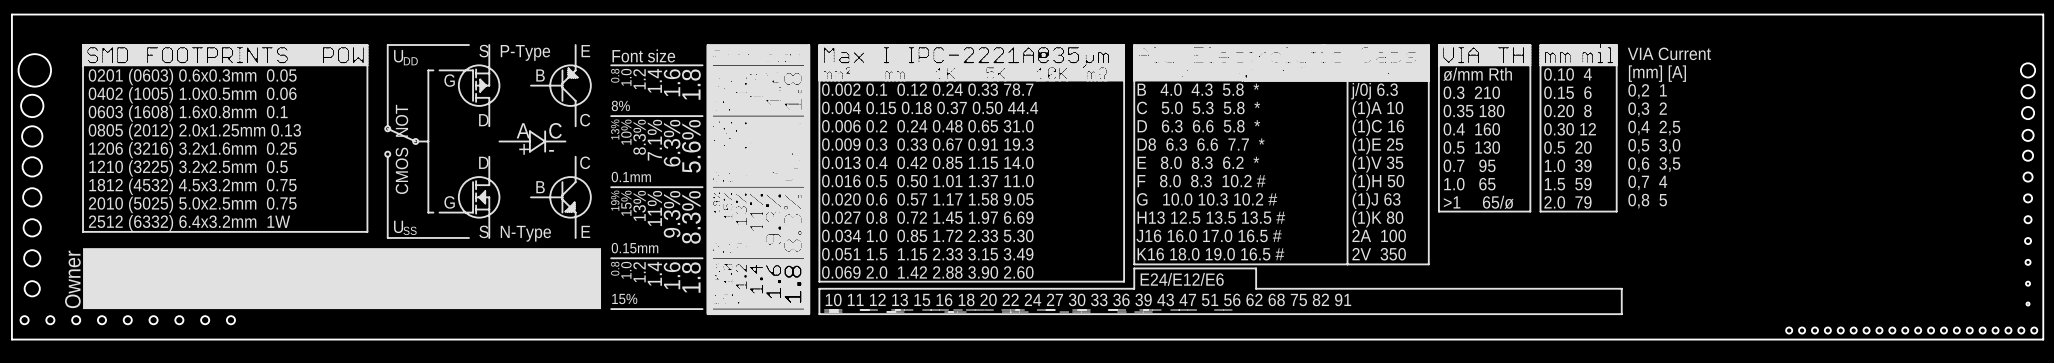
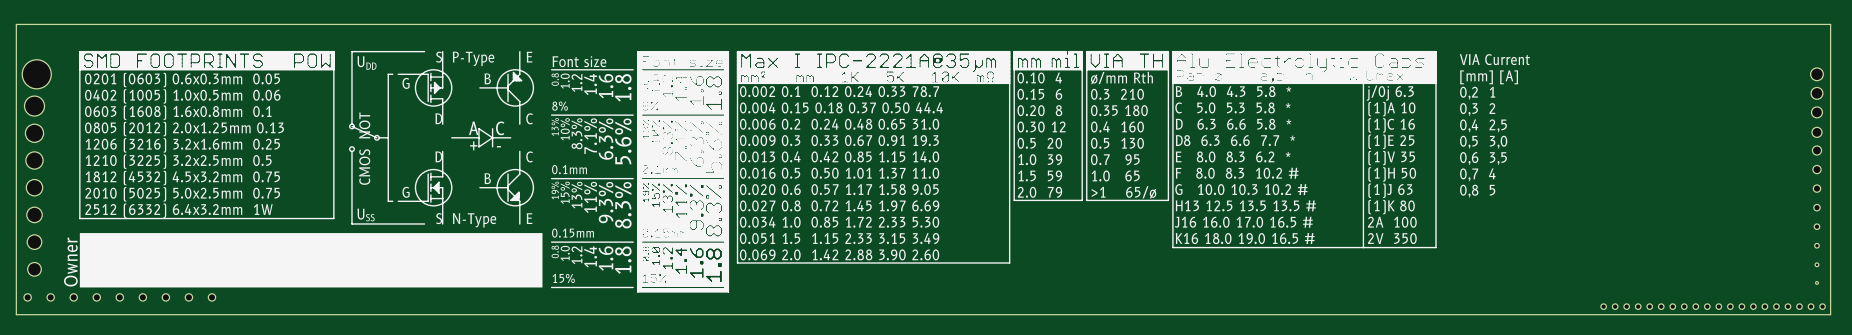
drawing: none -> [1013, 50, 1083, 202]
drawing: [1539, 44, 1618, 213] -> none
drawing position: (1484, 128) -> (1127, 126)
drawing position: (1281, 154) -> (1304, 149)
line: (1256, 268) (1134, 268) (1134, 288) (819, 288) (819, 314) (1621, 314) (1621, 288) (1256, 288) (1256, 268) -> none
text: E24/E12/E6 (1182, 279) -> none
text: 10 11 12 13 15 16 18 20 22 24 27 30 33 36 39 43 47 51 56 62 68 75 82 91 (1088, 299) -> none
text: _ _ _ _ _ _ _ _ _ _ _ _ (1004, 310) -> none
text: __ __ __ __ __ __ __ __ __ __ __ __ (1028, 310) -> none
text: _ _ _ _ _ _ (977, 312) -> none
text: __ __ __ __ __ __ (988, 312) -> none

